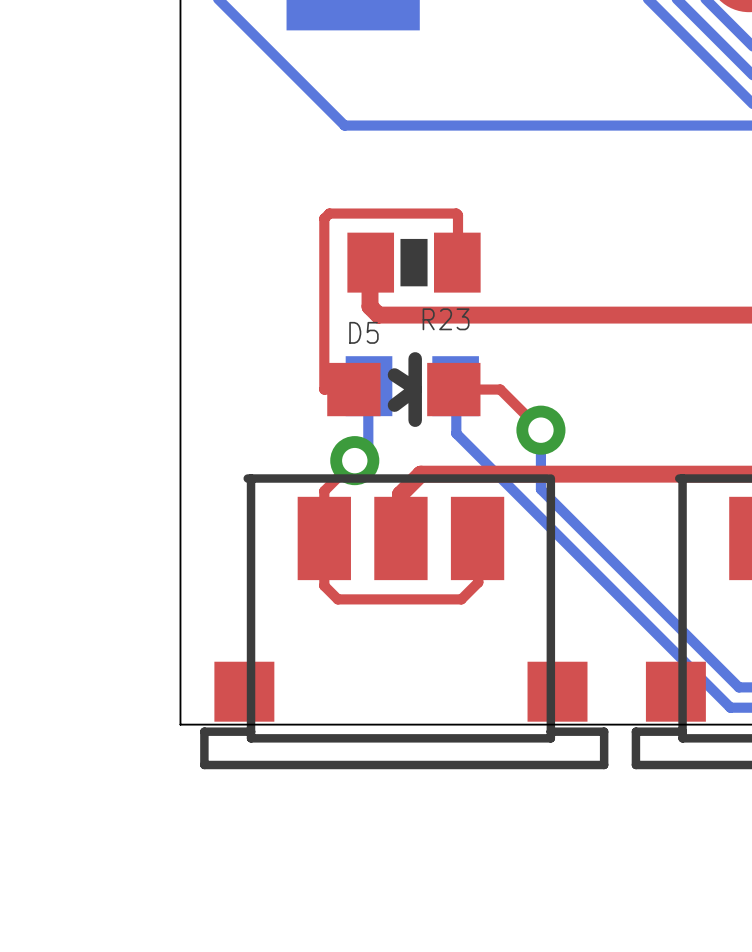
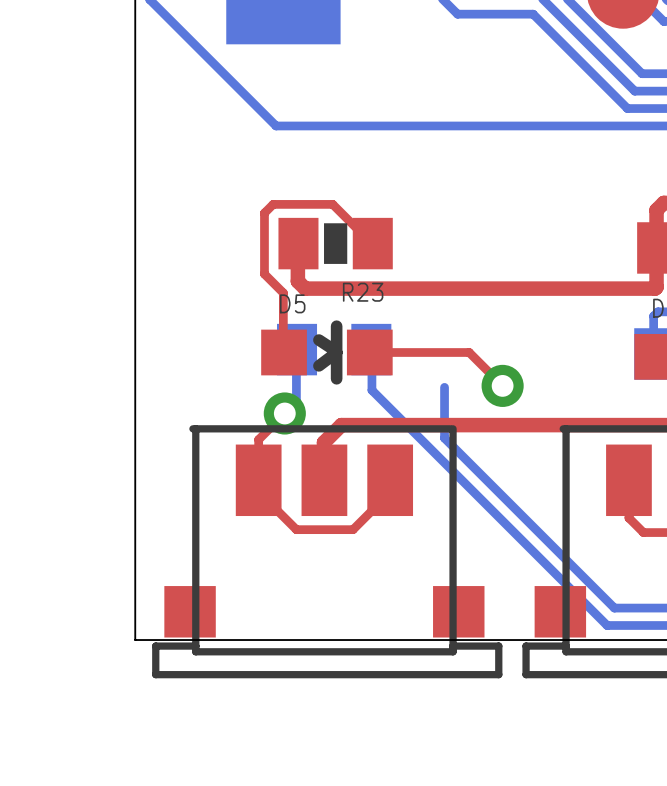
top track: (458, 262) (458, 215) (456, 213) (329, 213) (324, 218) (324, 389) (353, 389) -> (371, 243) (332, 204) (273, 204) (264, 213) (264, 274) (283, 292) (283, 352)
top track: (500, 389) (540, 430) -> (409, 352) (469, 352) (502, 385)
via position: (540, 430) -> (502, 385)
top track: (324, 538) (324, 585) (337, 599) (461, 599) (478, 582) (478, 538) -> (258, 480) (261, 483) (261, 494) (296, 529) (353, 529) (389, 493) (389, 480)

